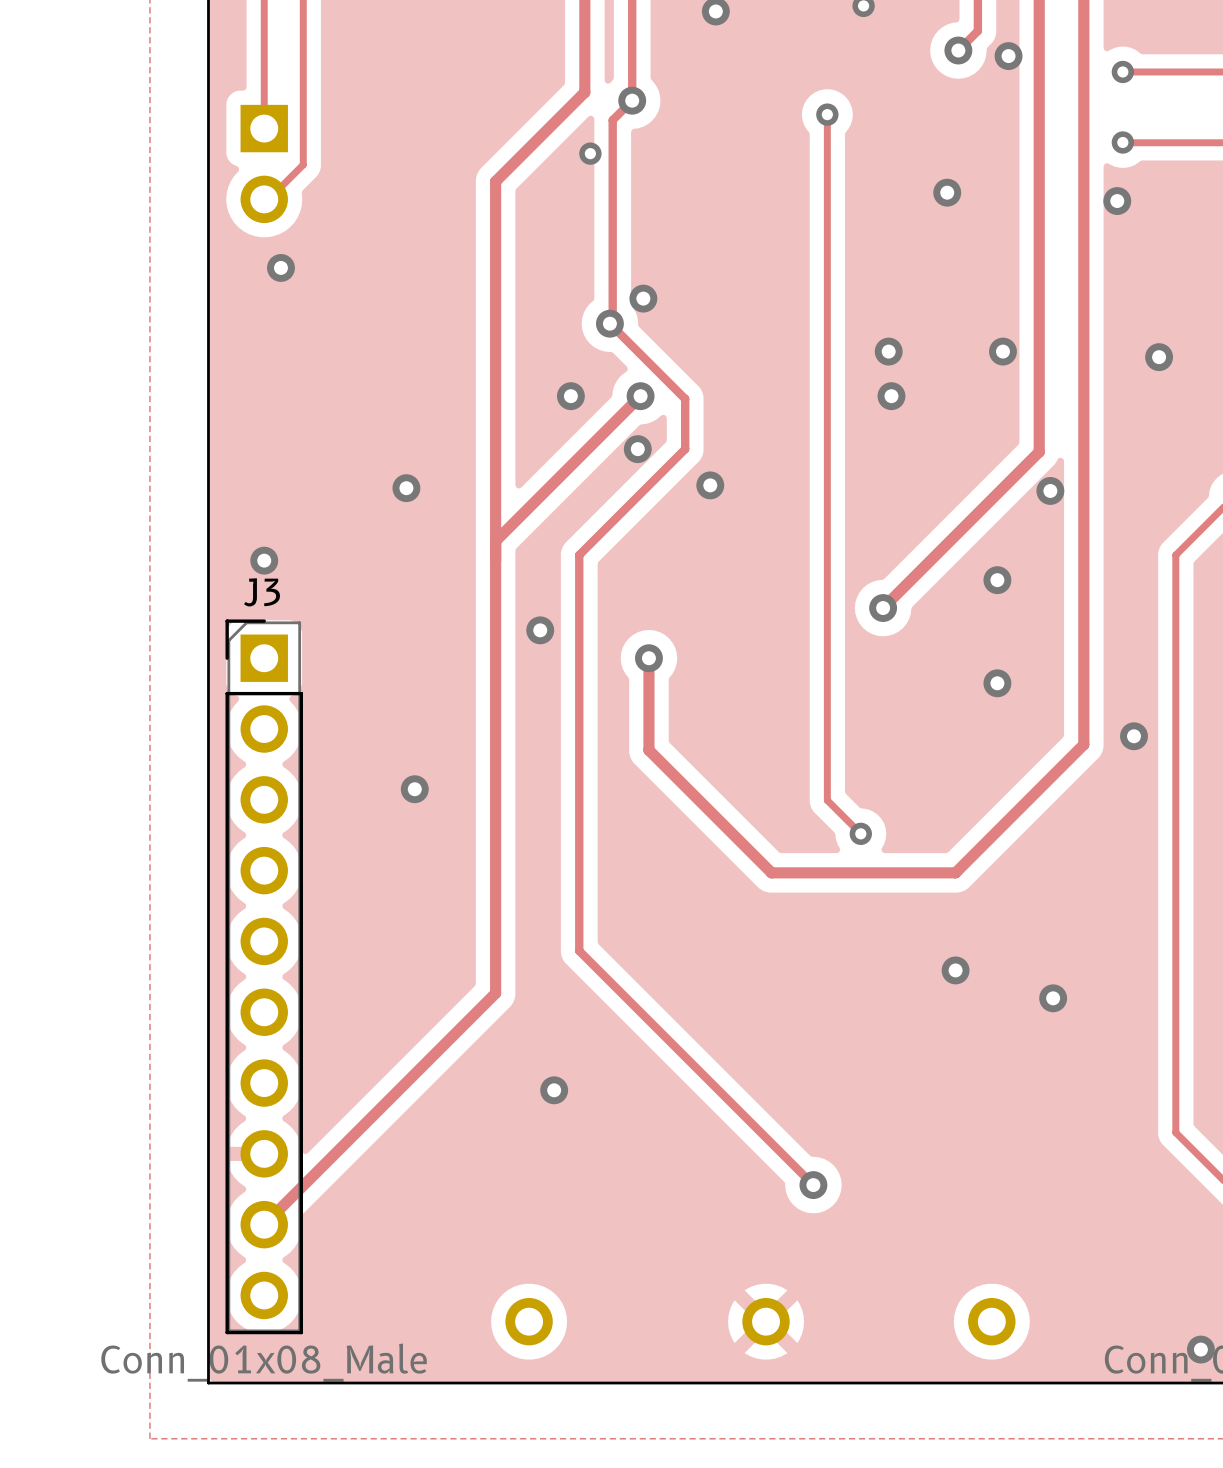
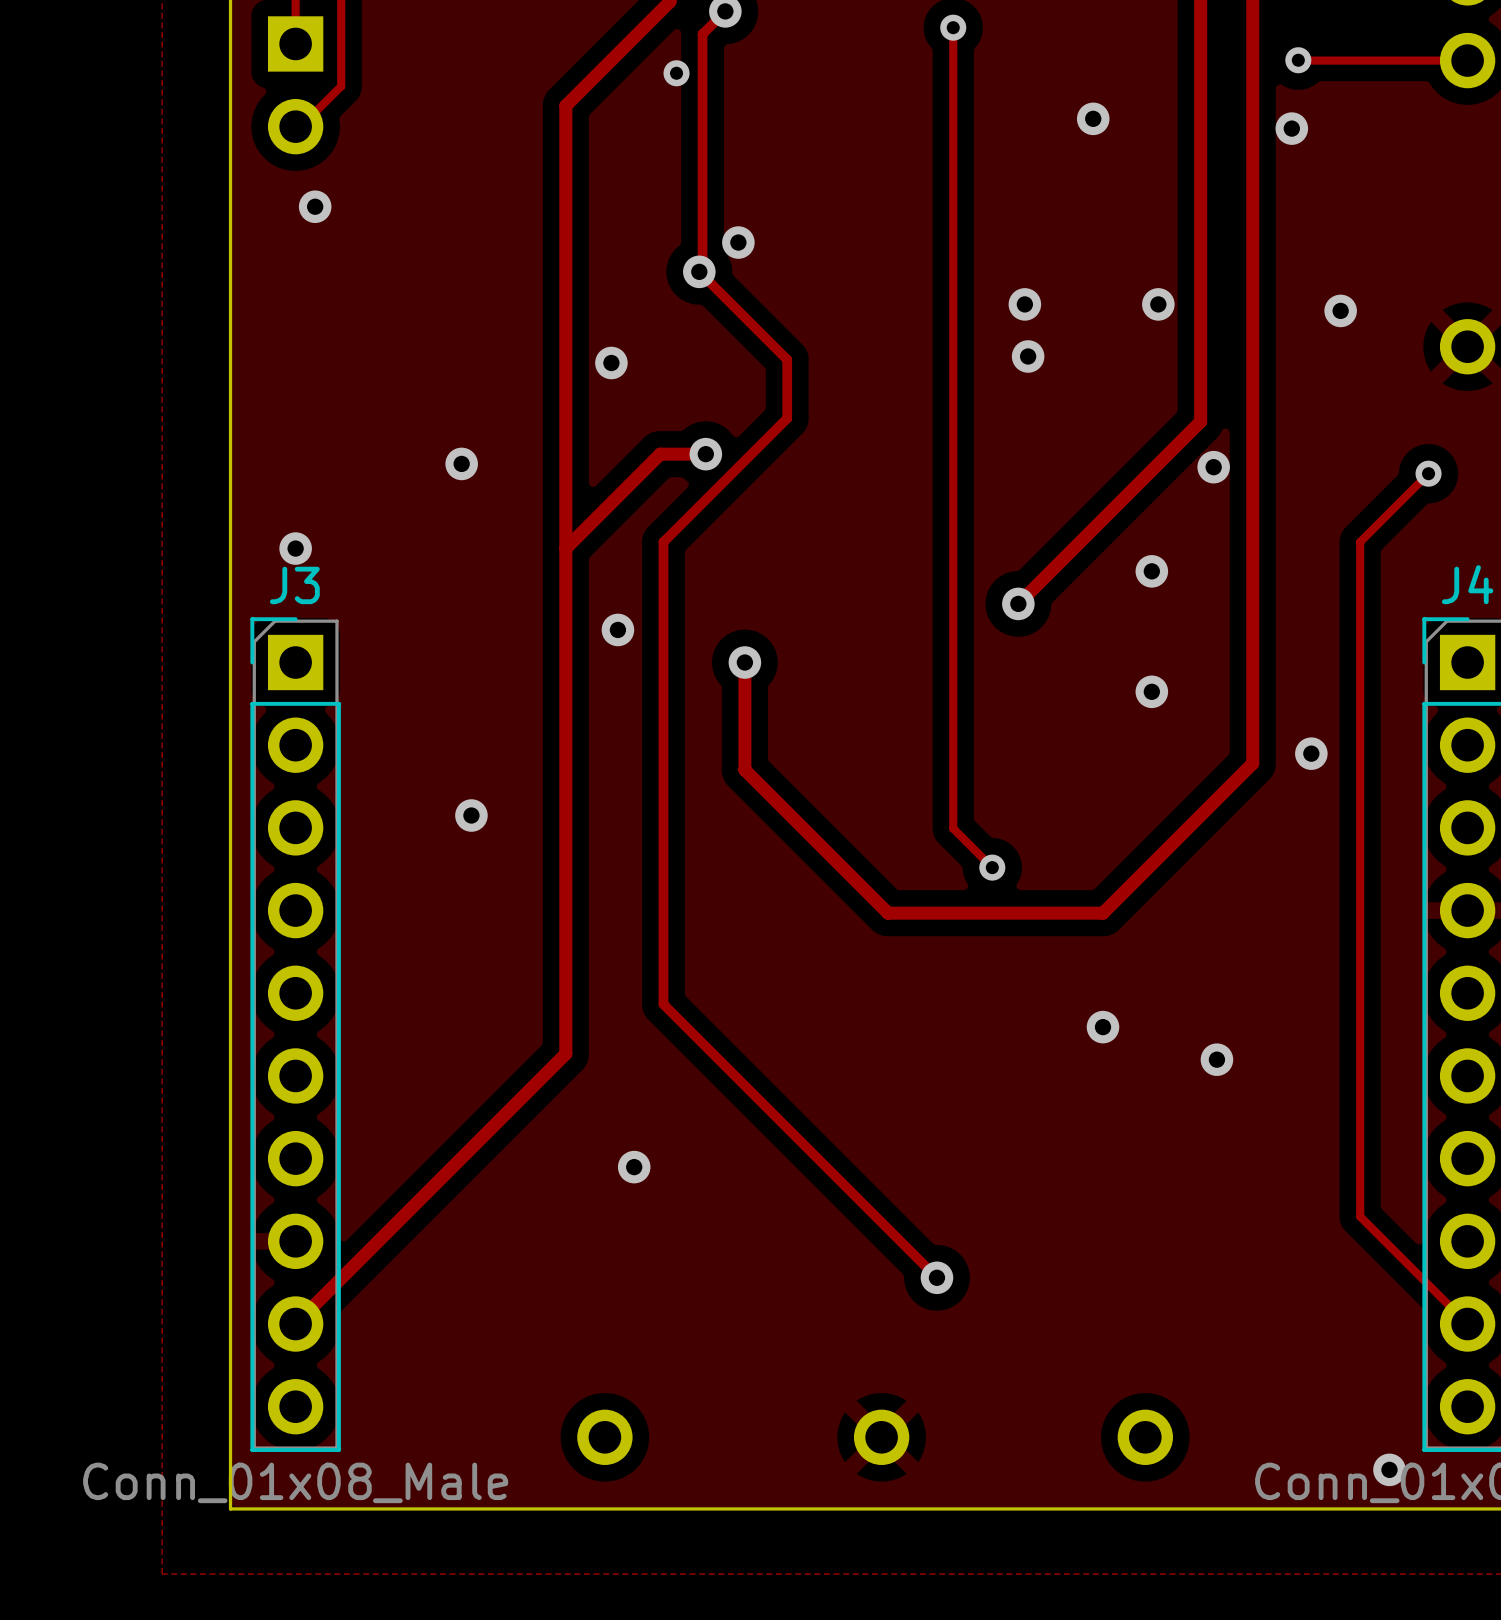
via position: (570, 396) -> (611, 363)
track: (640, 396) (495, 541) -> none
via: (640, 396) -> none
via position: (637, 449) -> (705, 454)
track: none -> (705, 454) (660, 454) (565, 548)
via: (710, 485) -> none

